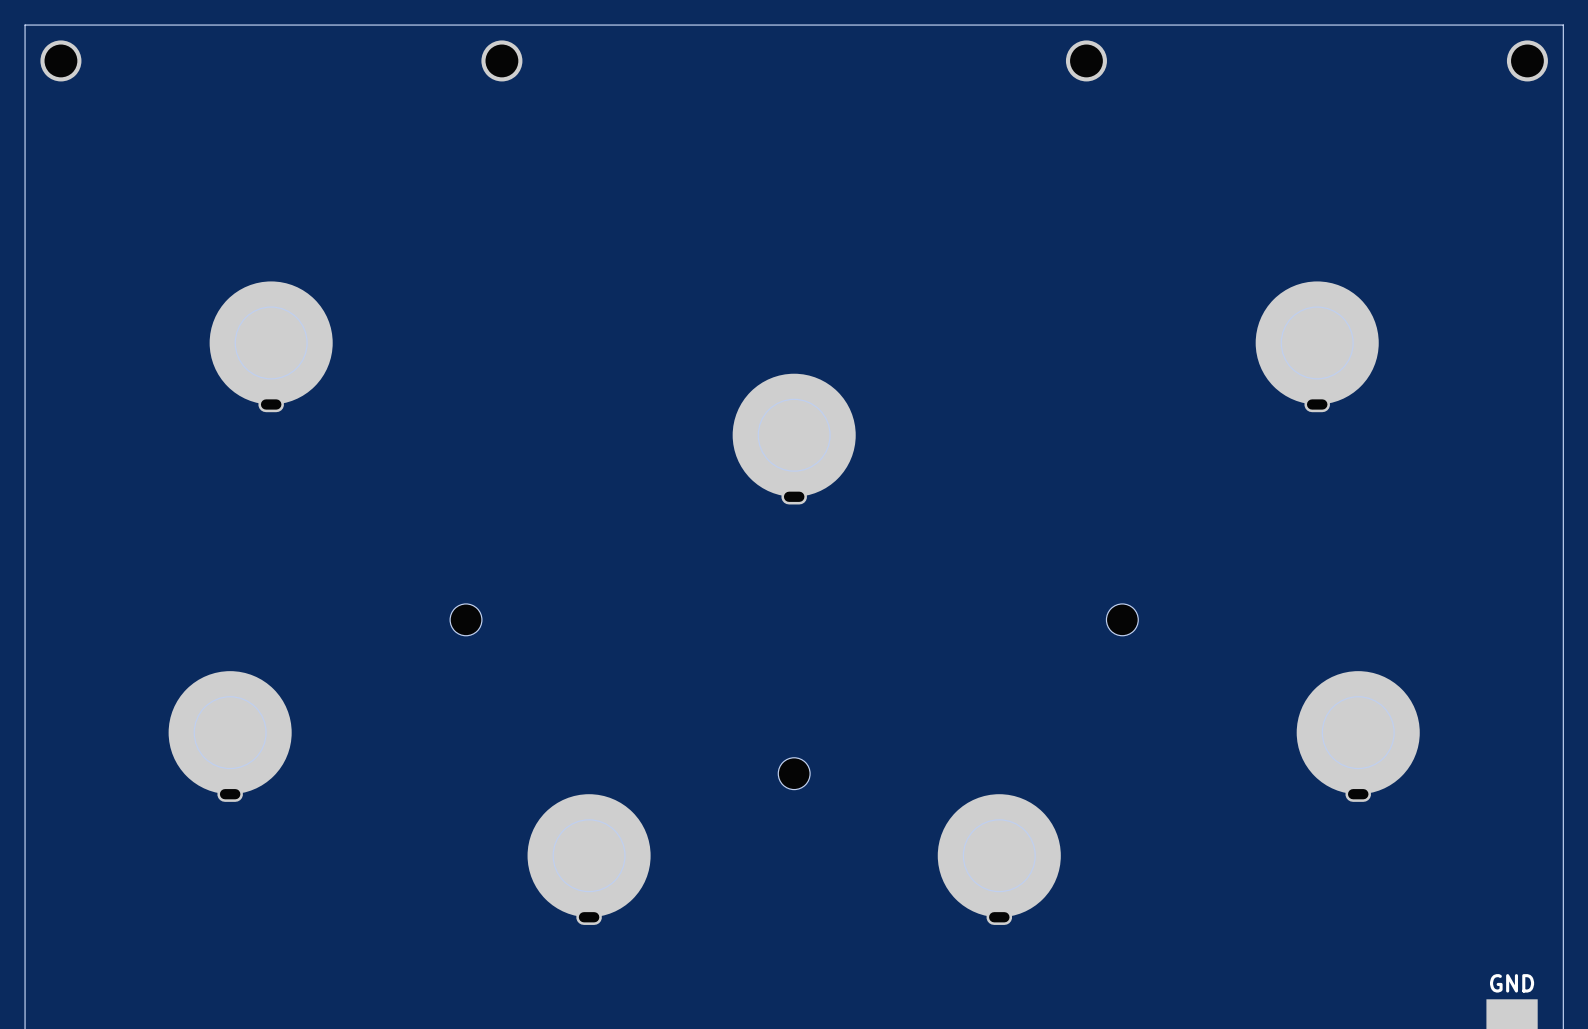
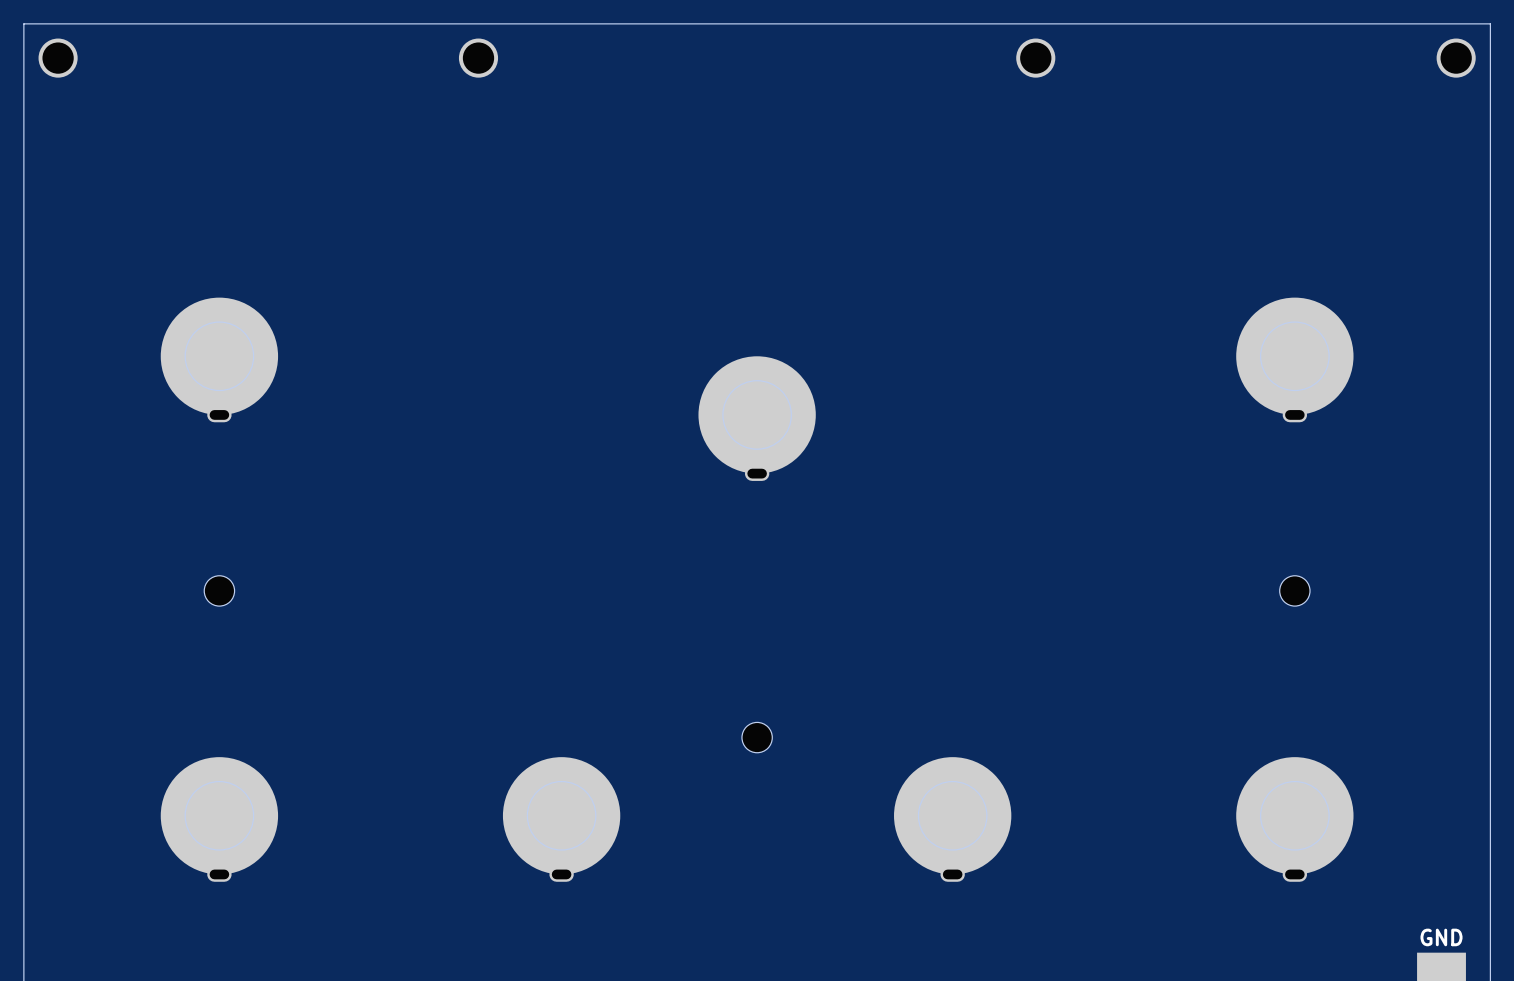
part position: (271, 346) -> (219, 359)
part position: (1317, 346) -> (1294, 359)
part position: (466, 619) -> (219, 590)
part position: (1122, 619) -> (1294, 590)
part: (230, 736) -> none
part: (1358, 736) -> none
part: none -> (219, 819)
part: none -> (1294, 819)

